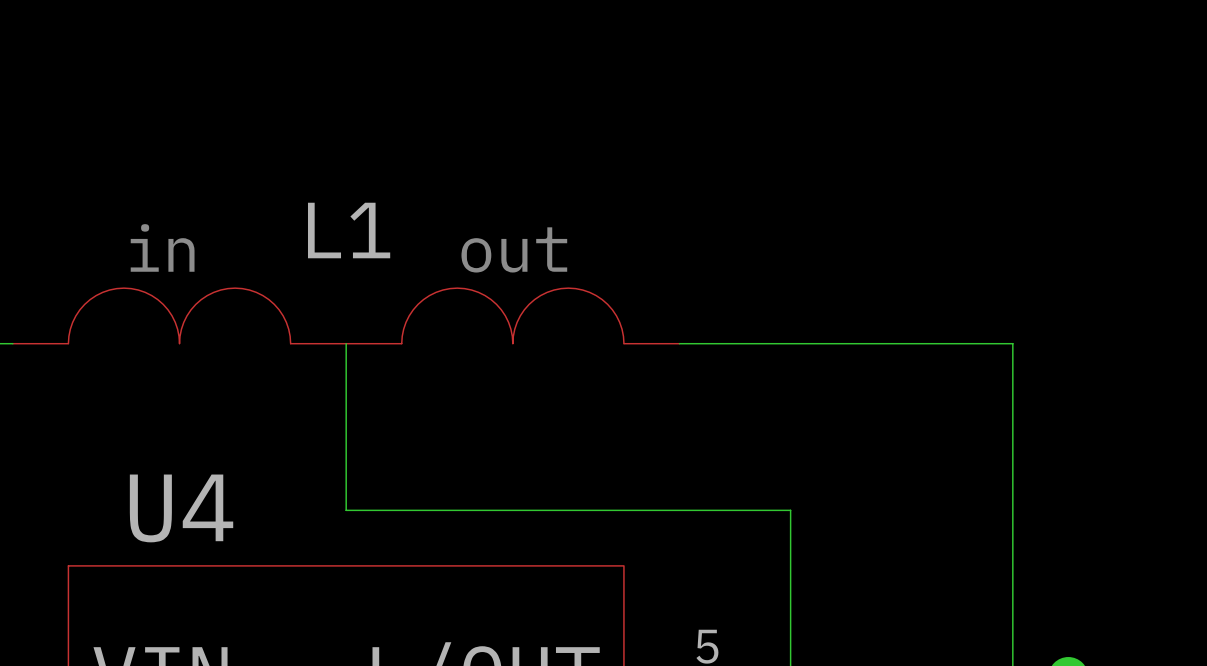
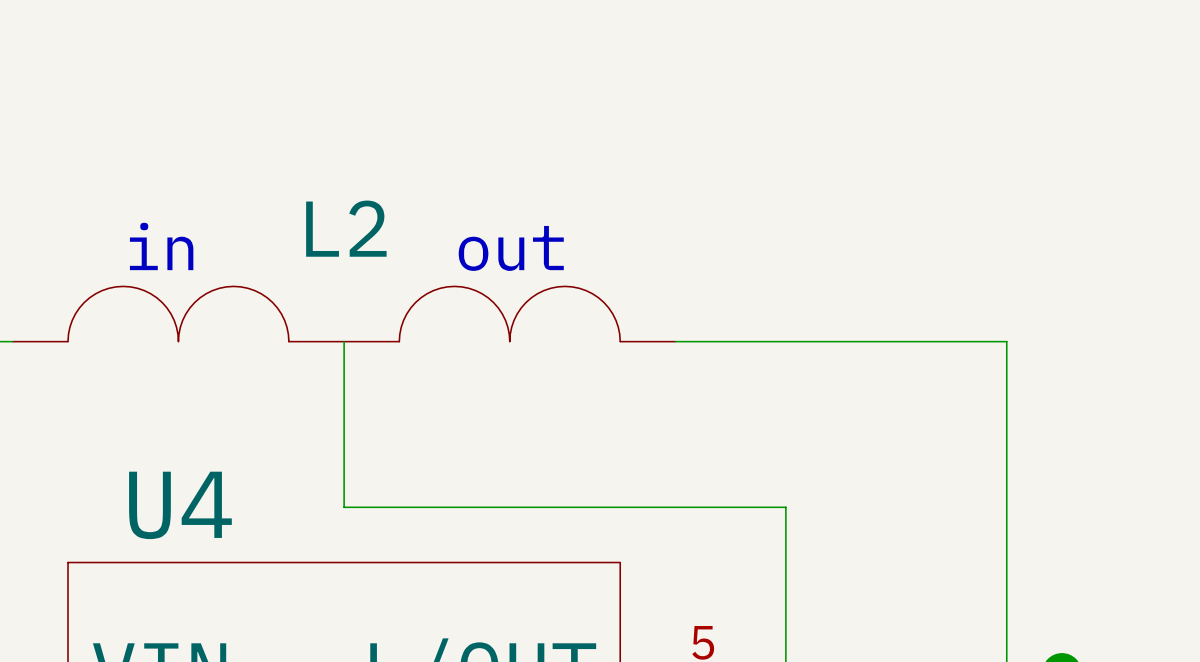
L1 name: L1 (349, 230) -> L2 (346, 228)

